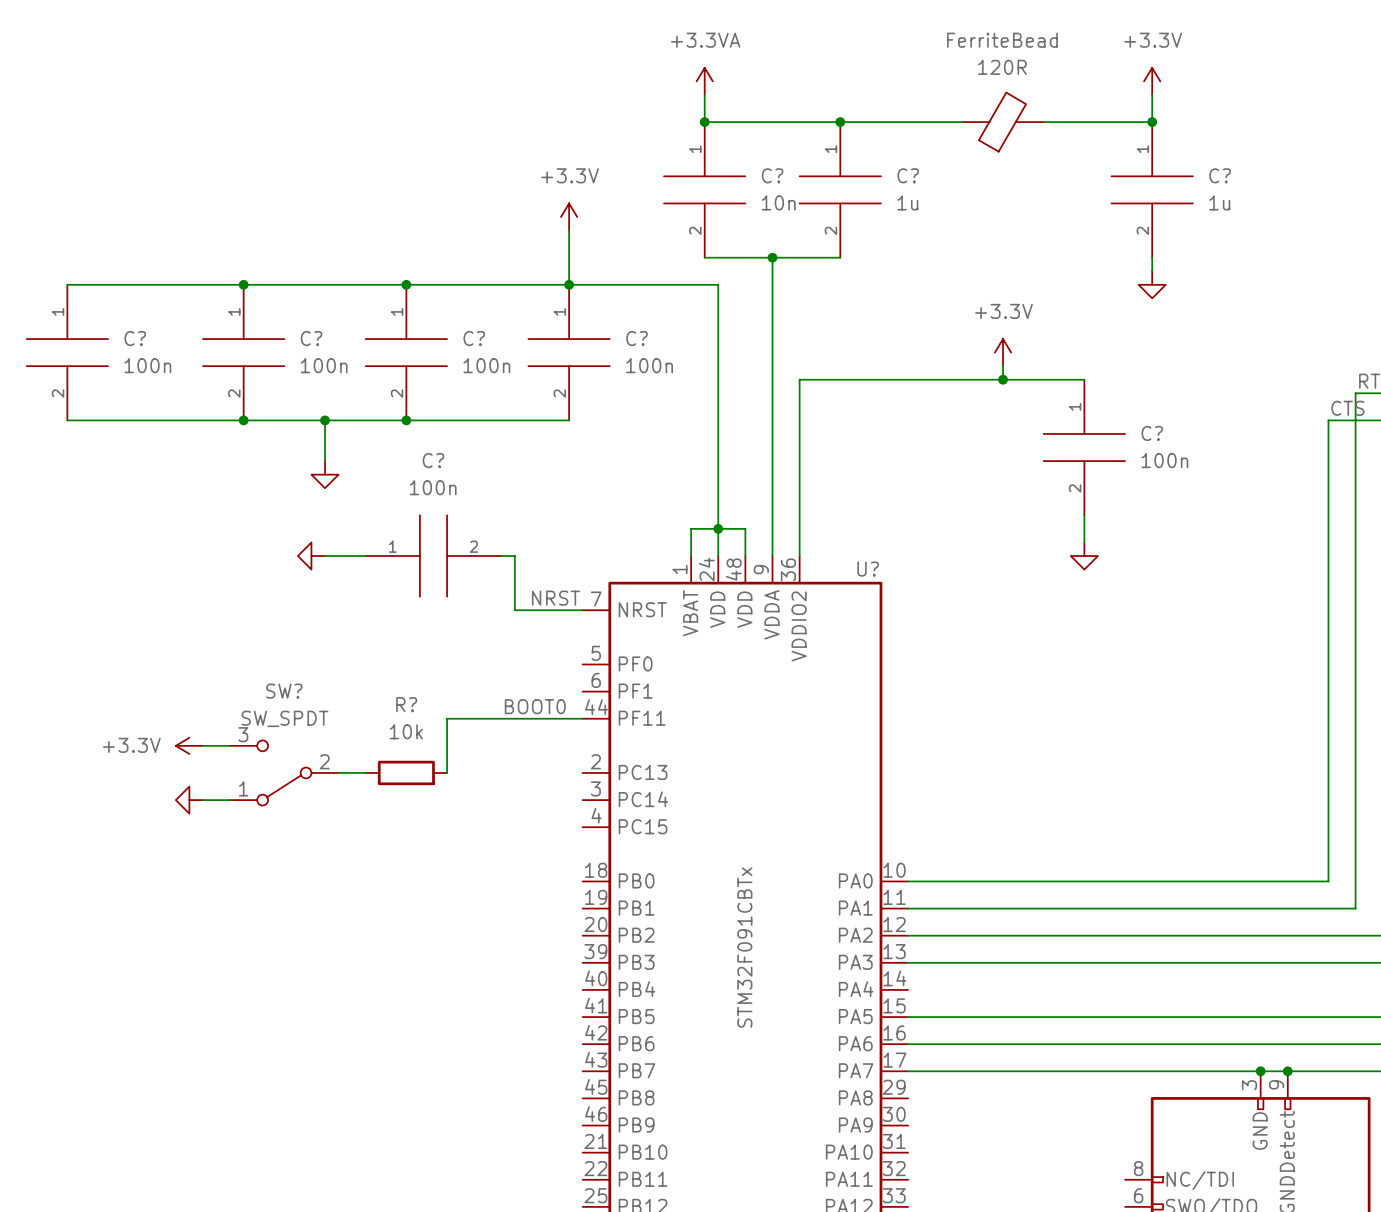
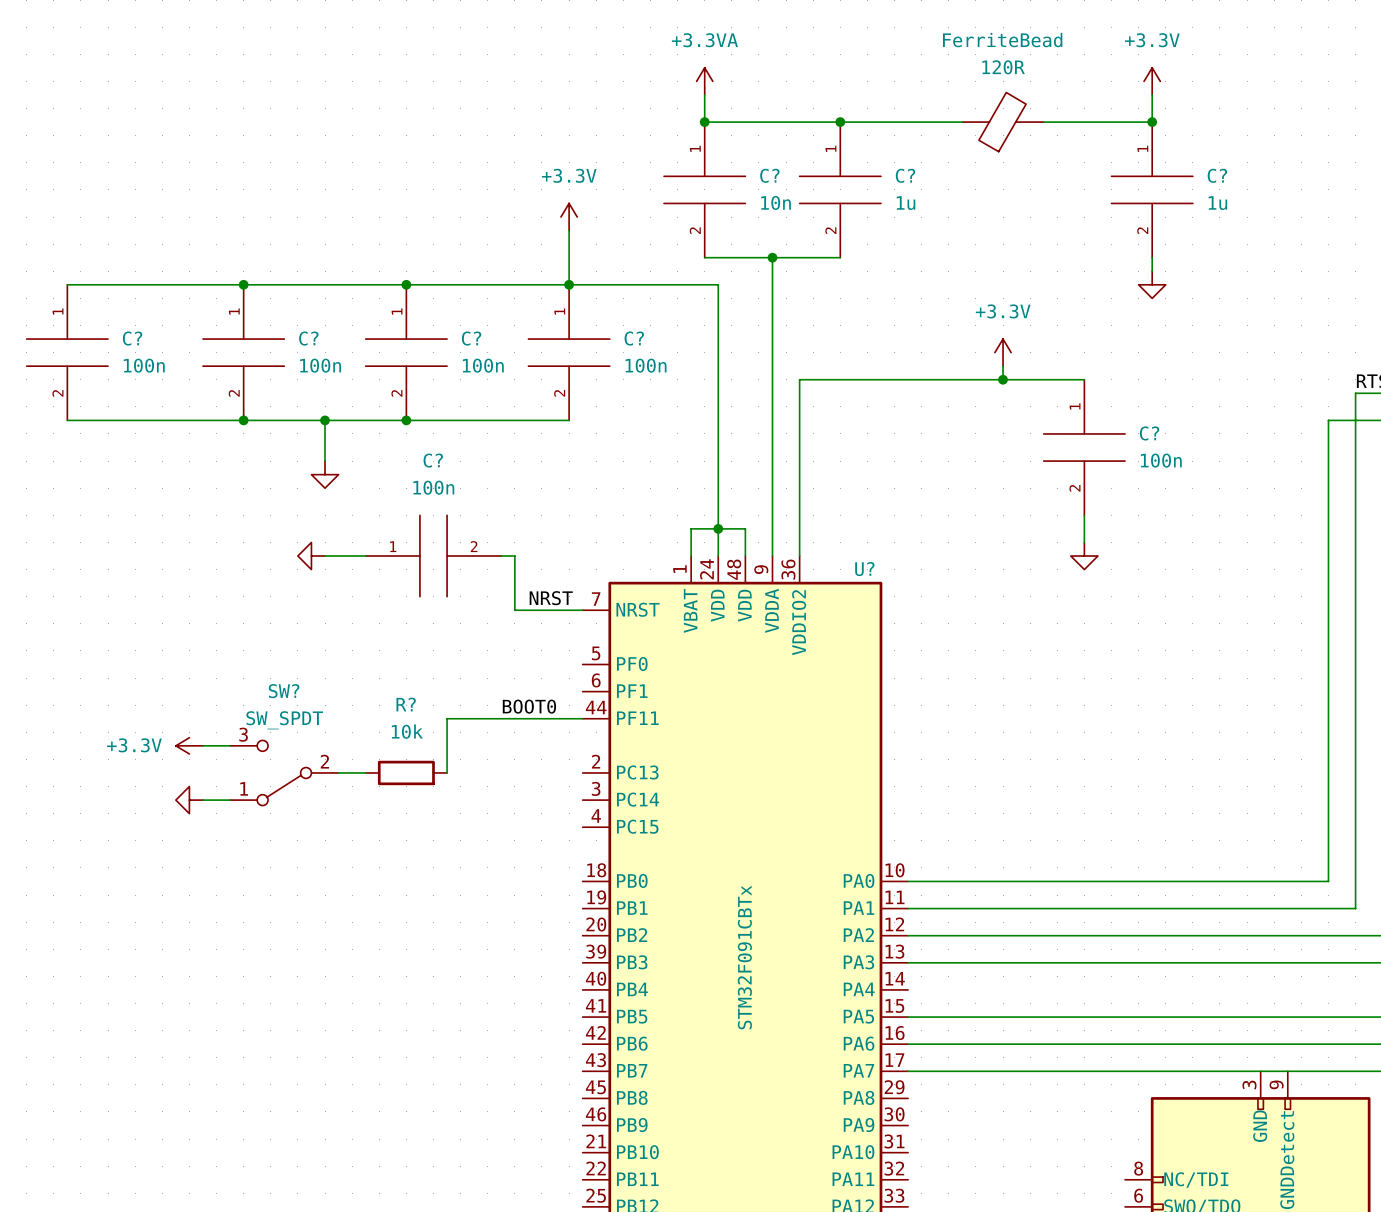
label: CTS (1347, 408) -> none
junction: (1260, 1071) -> none
junction: (1287, 1071) -> none

